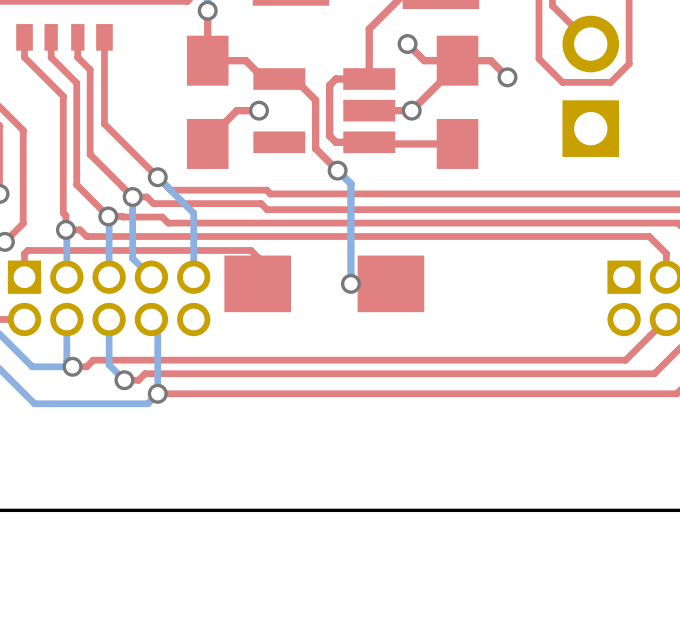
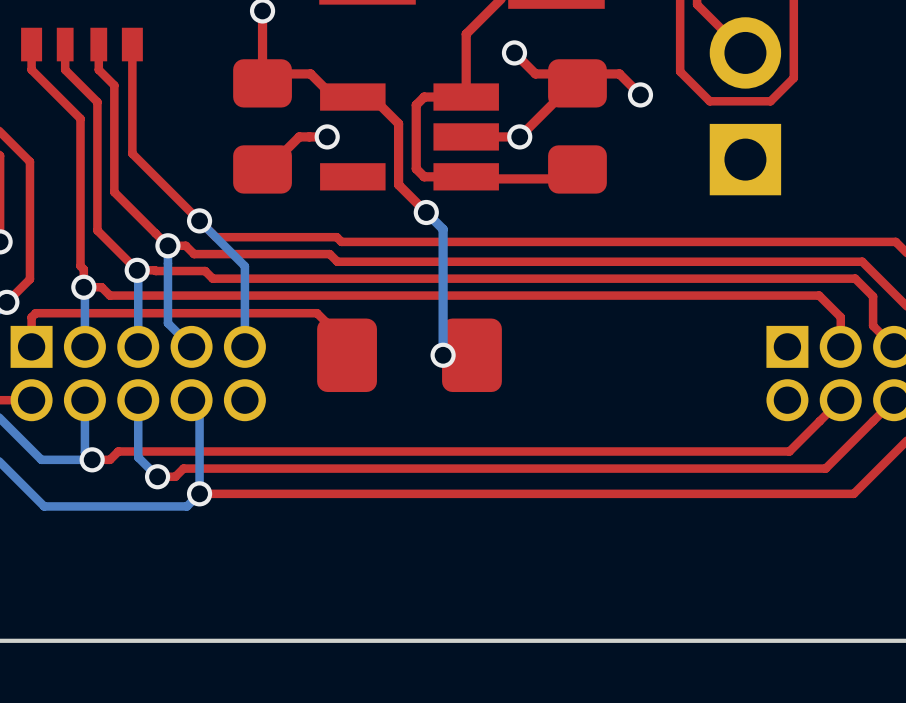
part footprint: [186, 35, 229, 169] -> [233, 59, 292, 194]
part footprint: [436, 35, 479, 169] -> [548, 59, 607, 194]
part footprint: [224, 255, 425, 313] -> [317, 318, 502, 393]

